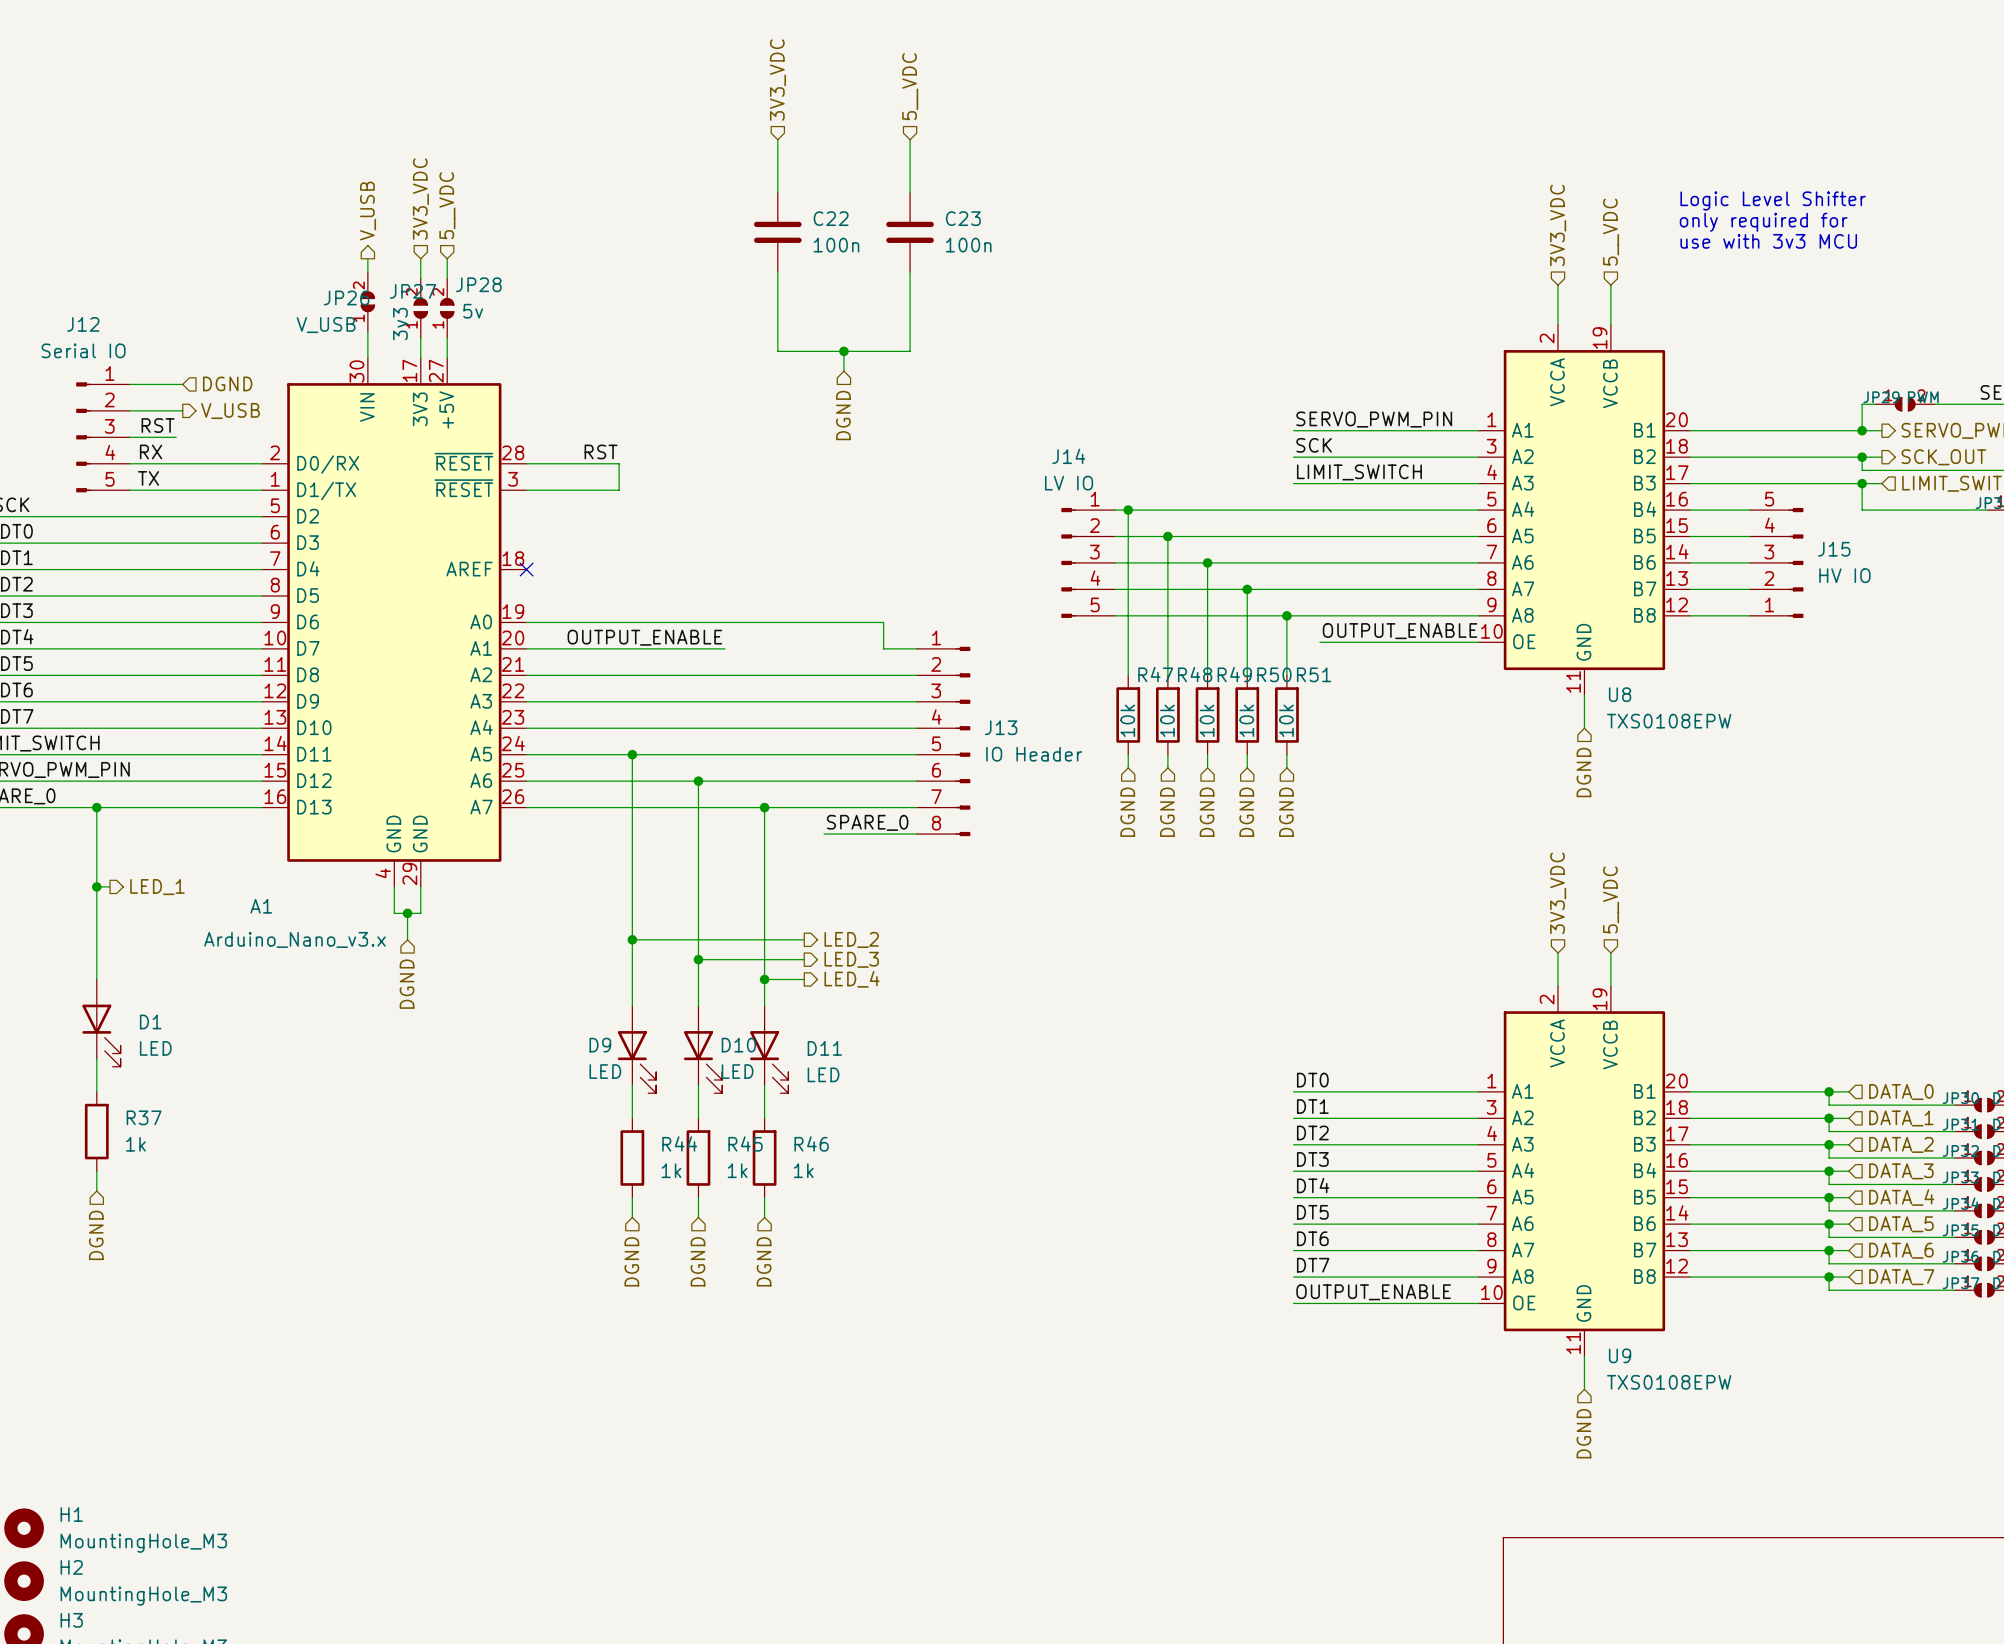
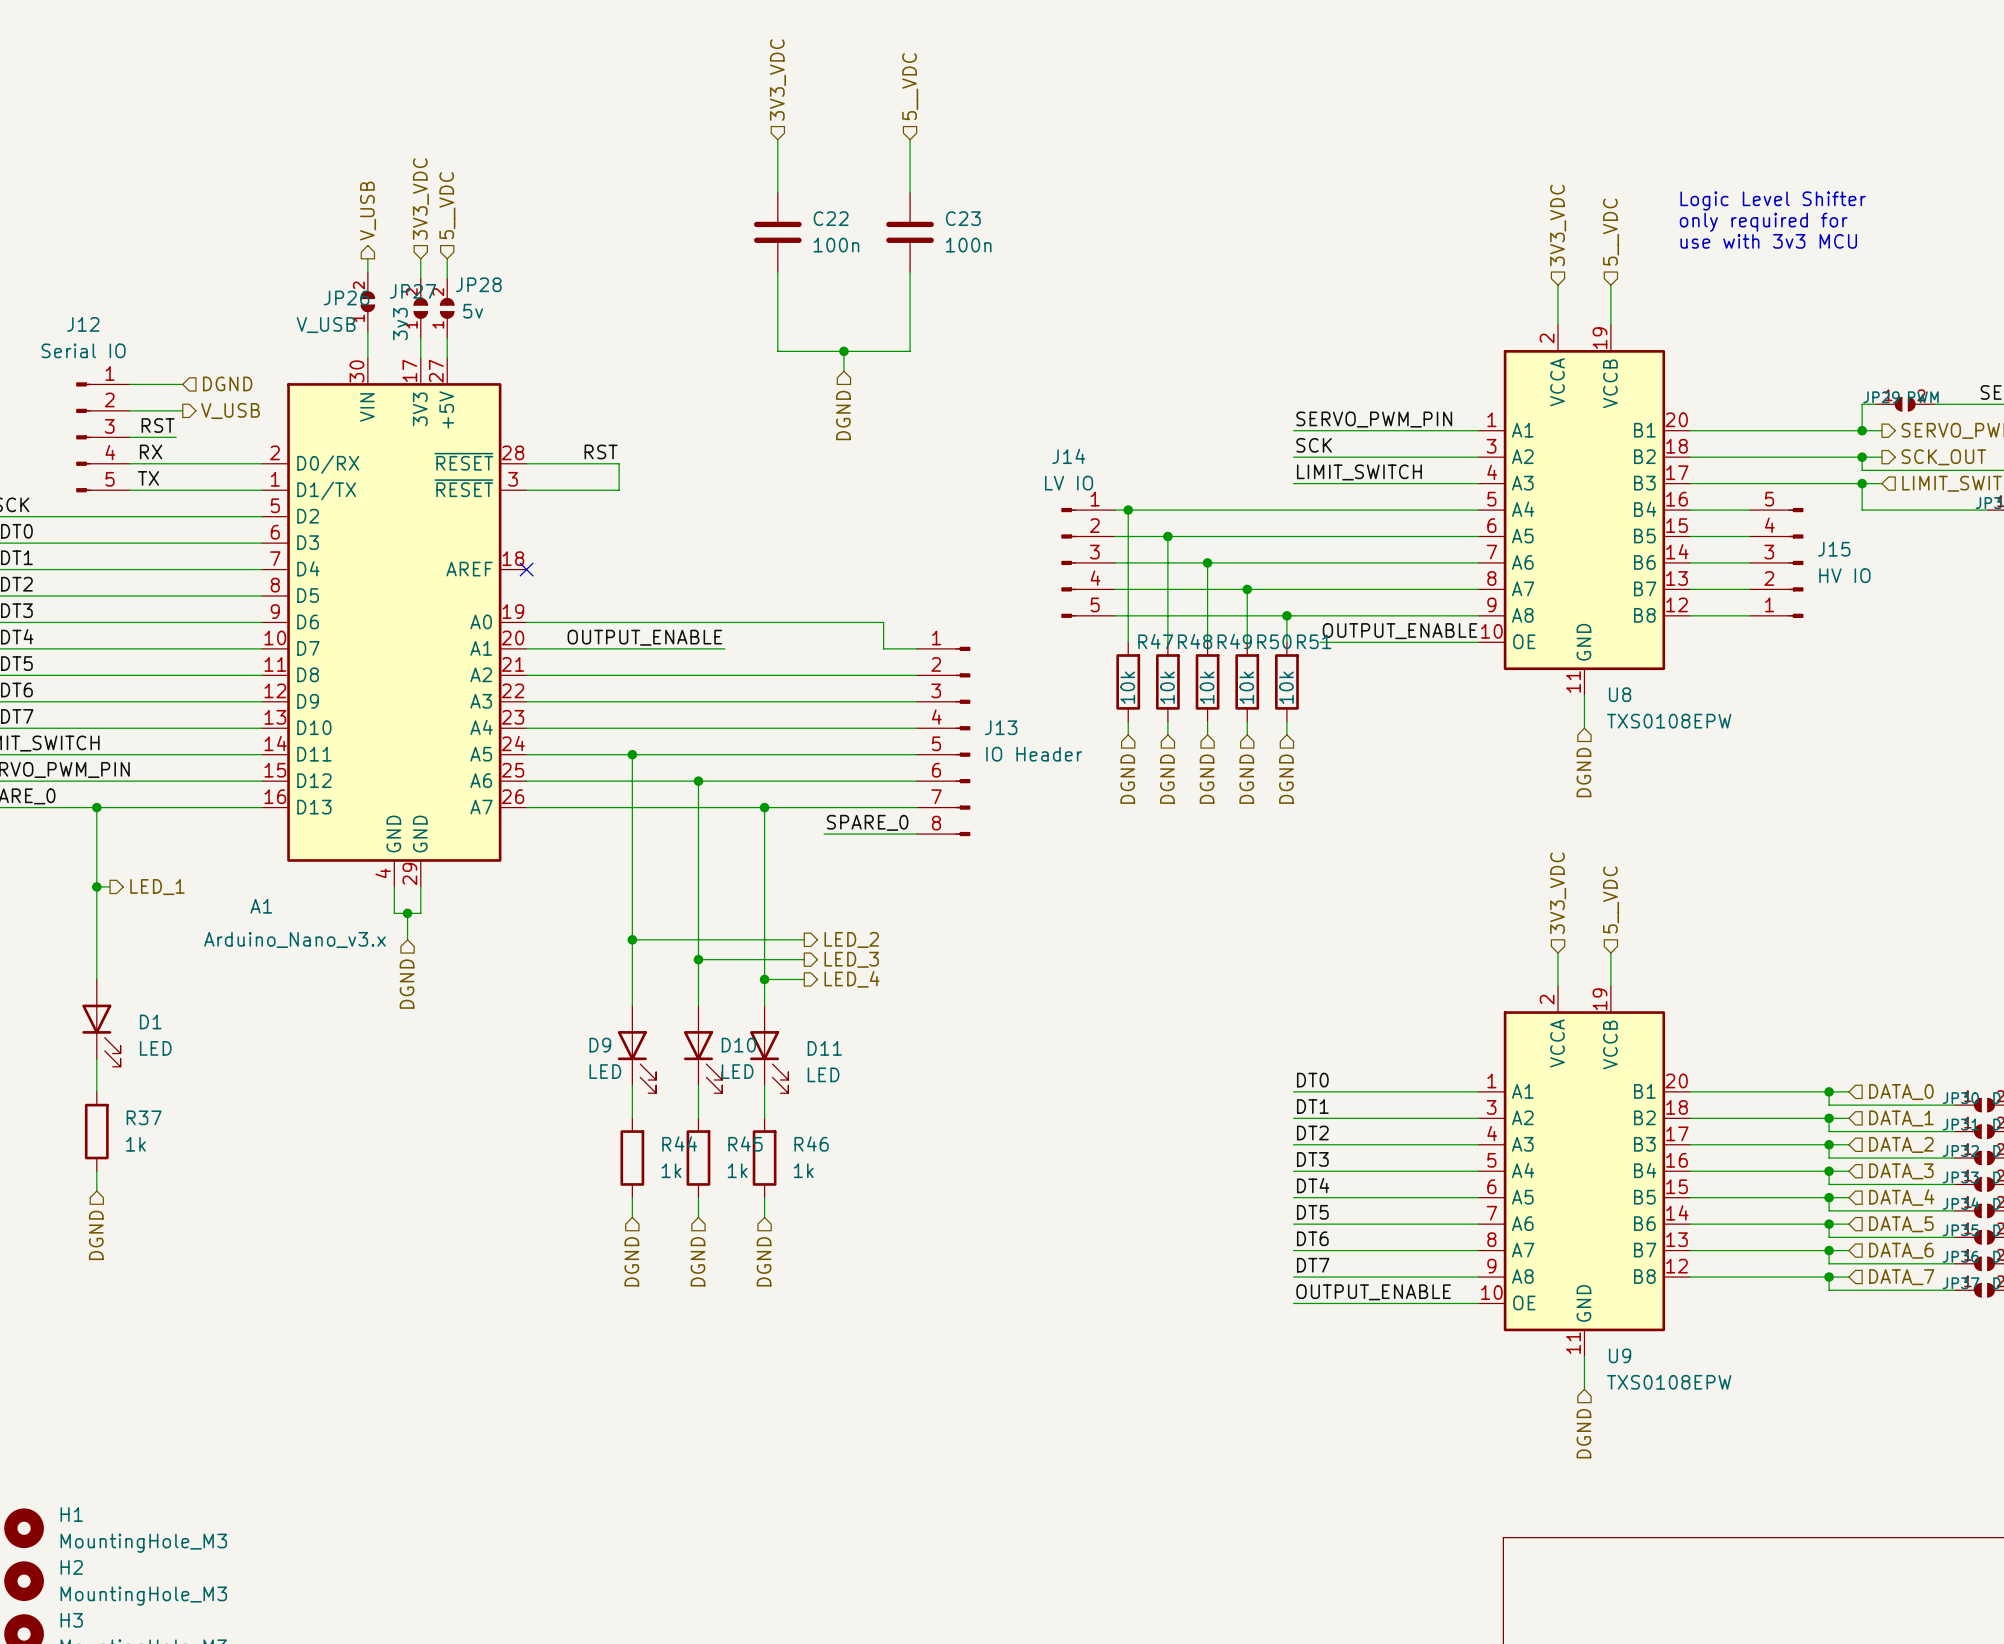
wire: (1128, 642) (1128, 675) -> none
wire: (1167, 642) (1167, 675) -> none
wire: (1207, 642) (1207, 675) -> none
wire: (1247, 642) (1247, 675) -> none
wire: (1286, 642) (1286, 675) -> none
R47 position: (1128, 715) -> (1128, 681)
R48 position: (1167, 715) -> (1167, 681)
R49 position: (1207, 715) -> (1207, 681)
R50 position: (1247, 715) -> (1247, 681)
R51 position: (1286, 715) -> (1286, 681)
wire: (1128, 754) (1128, 767) -> (1128, 721) (1128, 734)
wire: (1167, 754) (1167, 767) -> (1167, 721) (1167, 734)
wire: (1207, 754) (1207, 767) -> (1207, 721) (1207, 734)
wire: (1247, 754) (1247, 767) -> (1247, 721) (1247, 734)
wire: (1286, 754) (1286, 767) -> (1286, 721) (1286, 734)
hierarchical label position: DGND (1127, 812) -> DGND (1127, 779)
hierarchical label position: DGND (1167, 812) -> DGND (1167, 779)
hierarchical label position: DGND (1207, 812) -> DGND (1207, 779)
hierarchical label position: DGND (1246, 812) -> DGND (1246, 779)
hierarchical label position: DGND (1286, 812) -> DGND (1286, 779)

